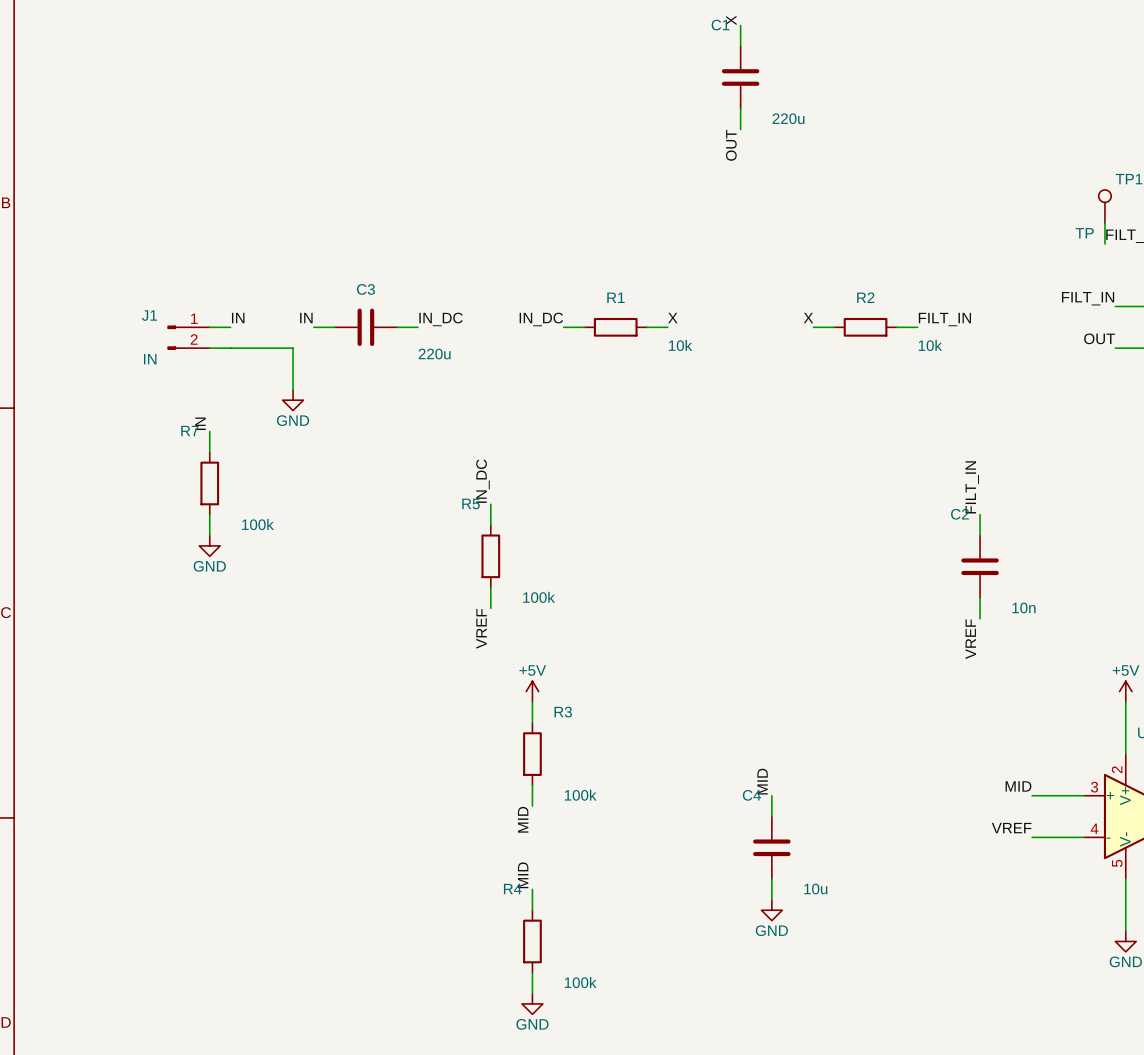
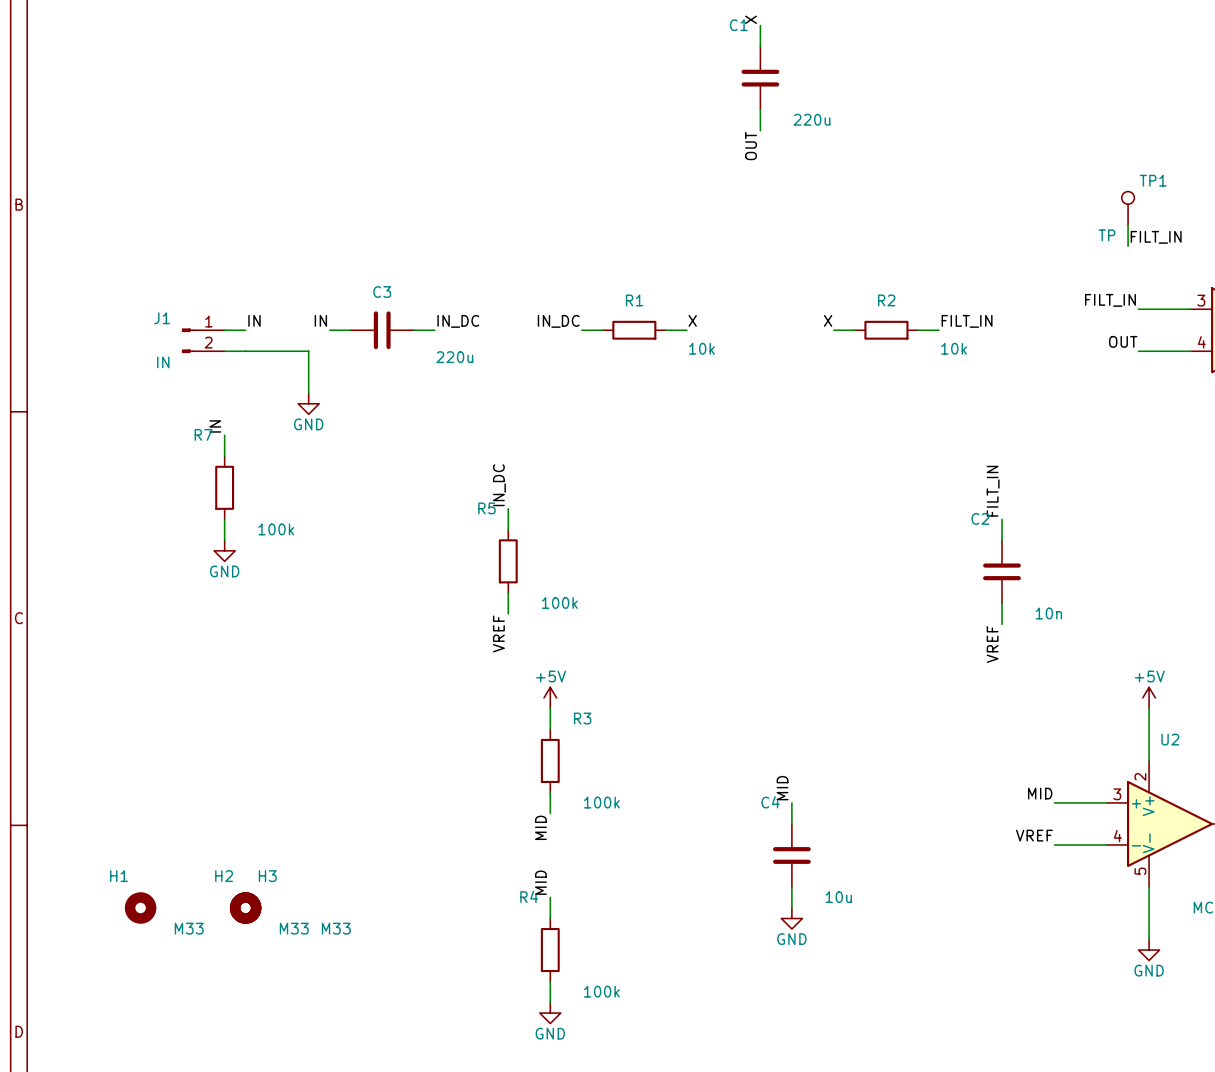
H1: none -> M33 (140, 908)
H2: none -> M33 (245, 908)
H3: none -> M33 (245, 908)

